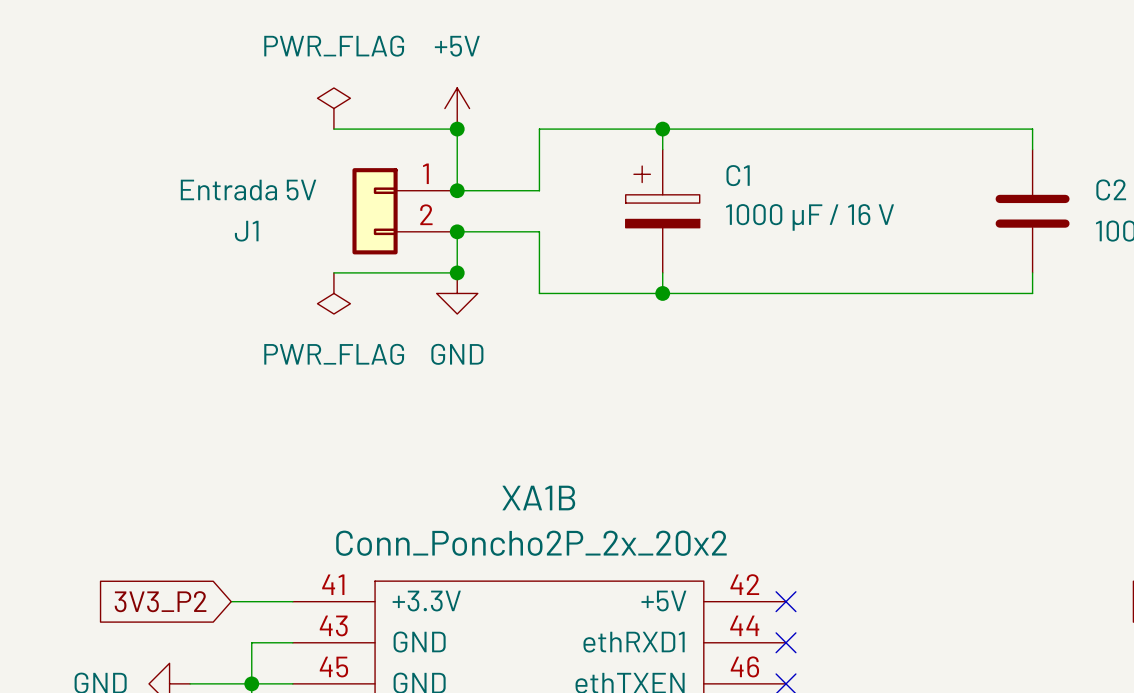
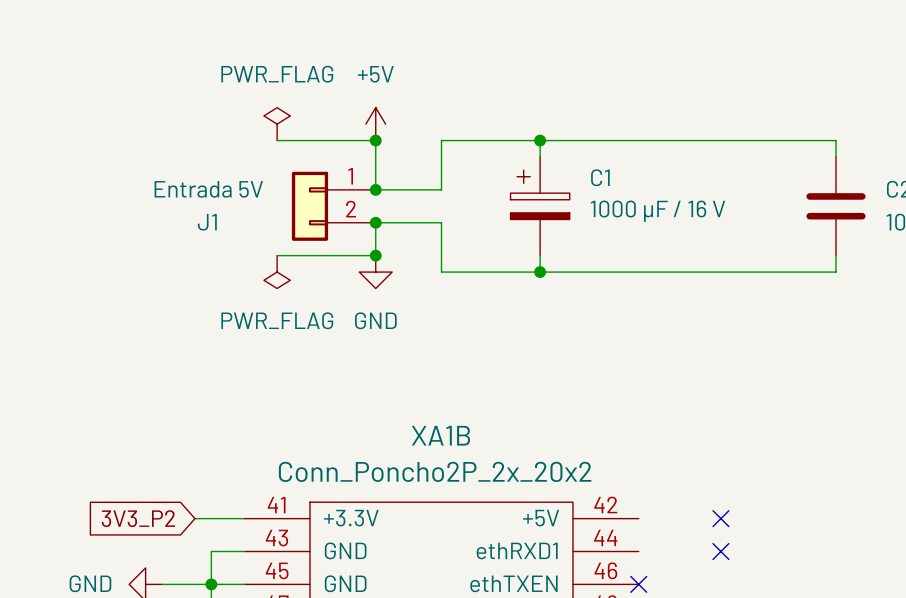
no-connect mark: (786, 601) -> none
no-connect mark: none -> (720, 518)
no-connect mark: (786, 642) -> none
no-connect mark: none -> (720, 551)

